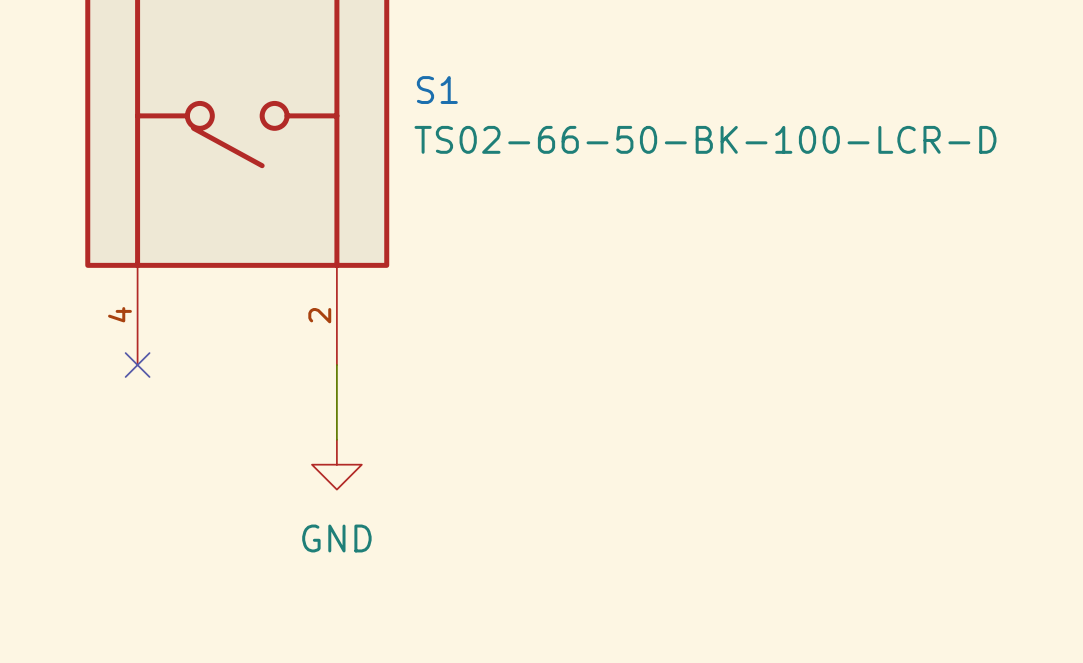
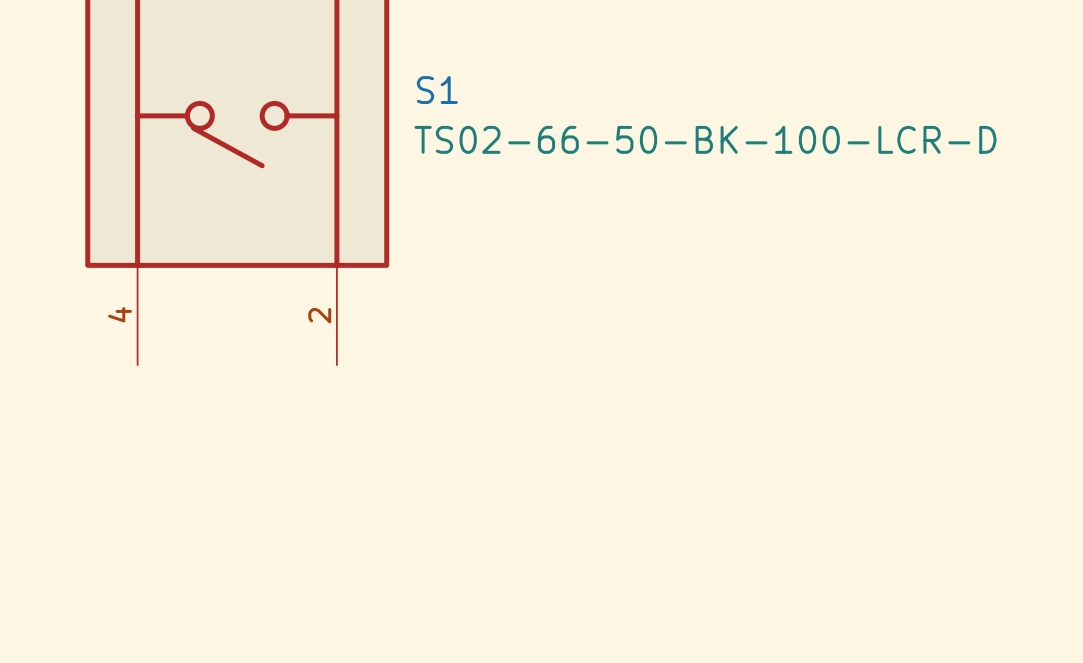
no-connect mark: (137, 365) -> none
wire: (336, 365) (336, 439) -> none
power symbol: GND (336, 464) -> none

